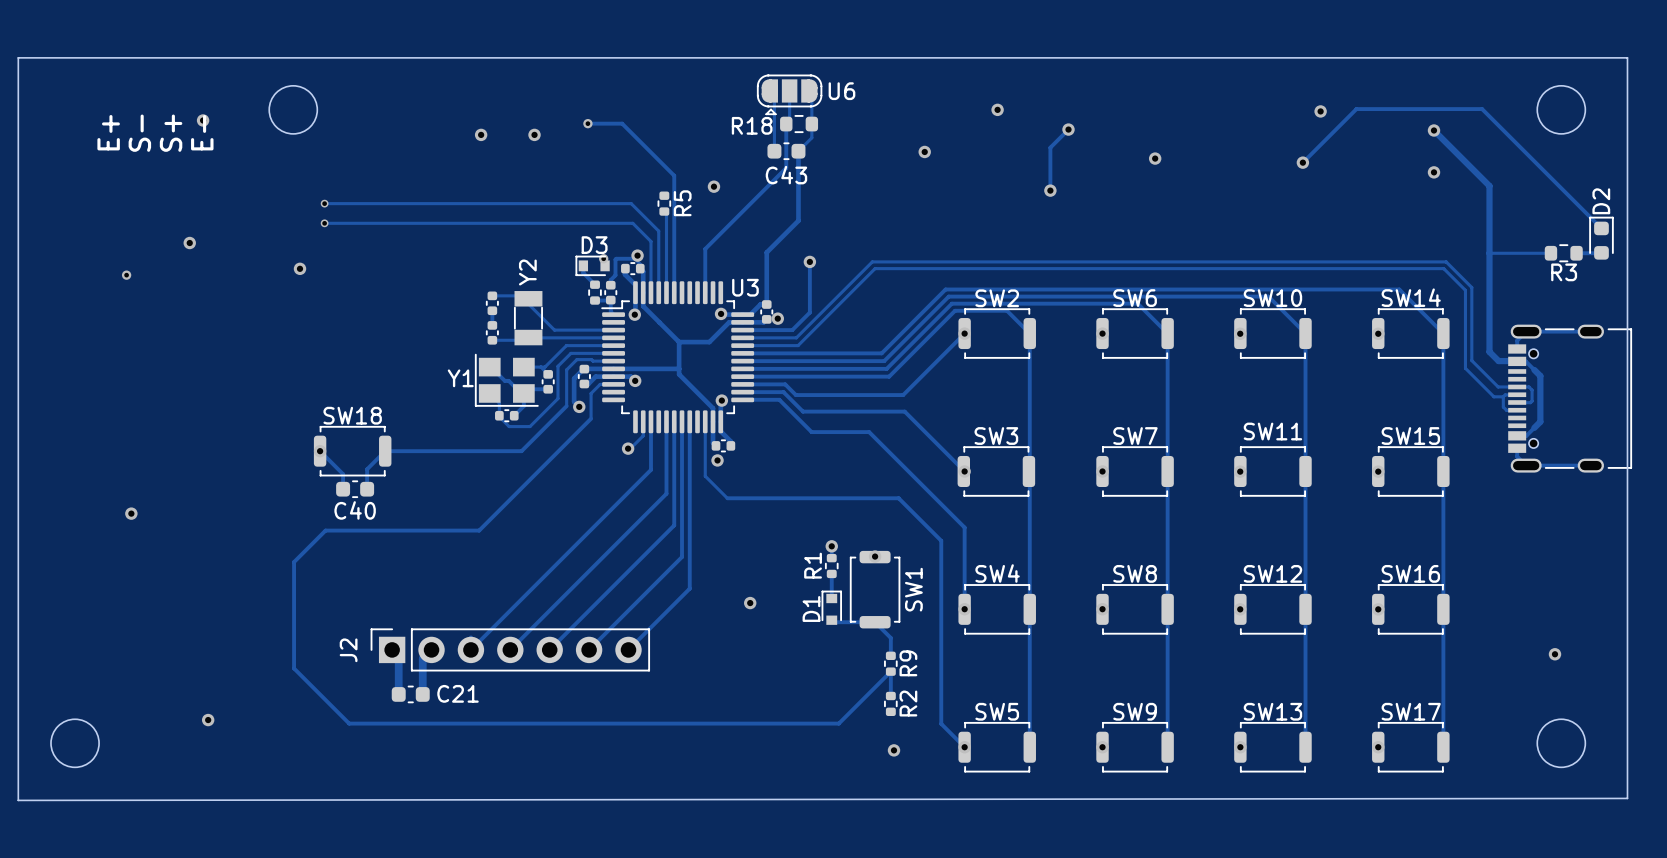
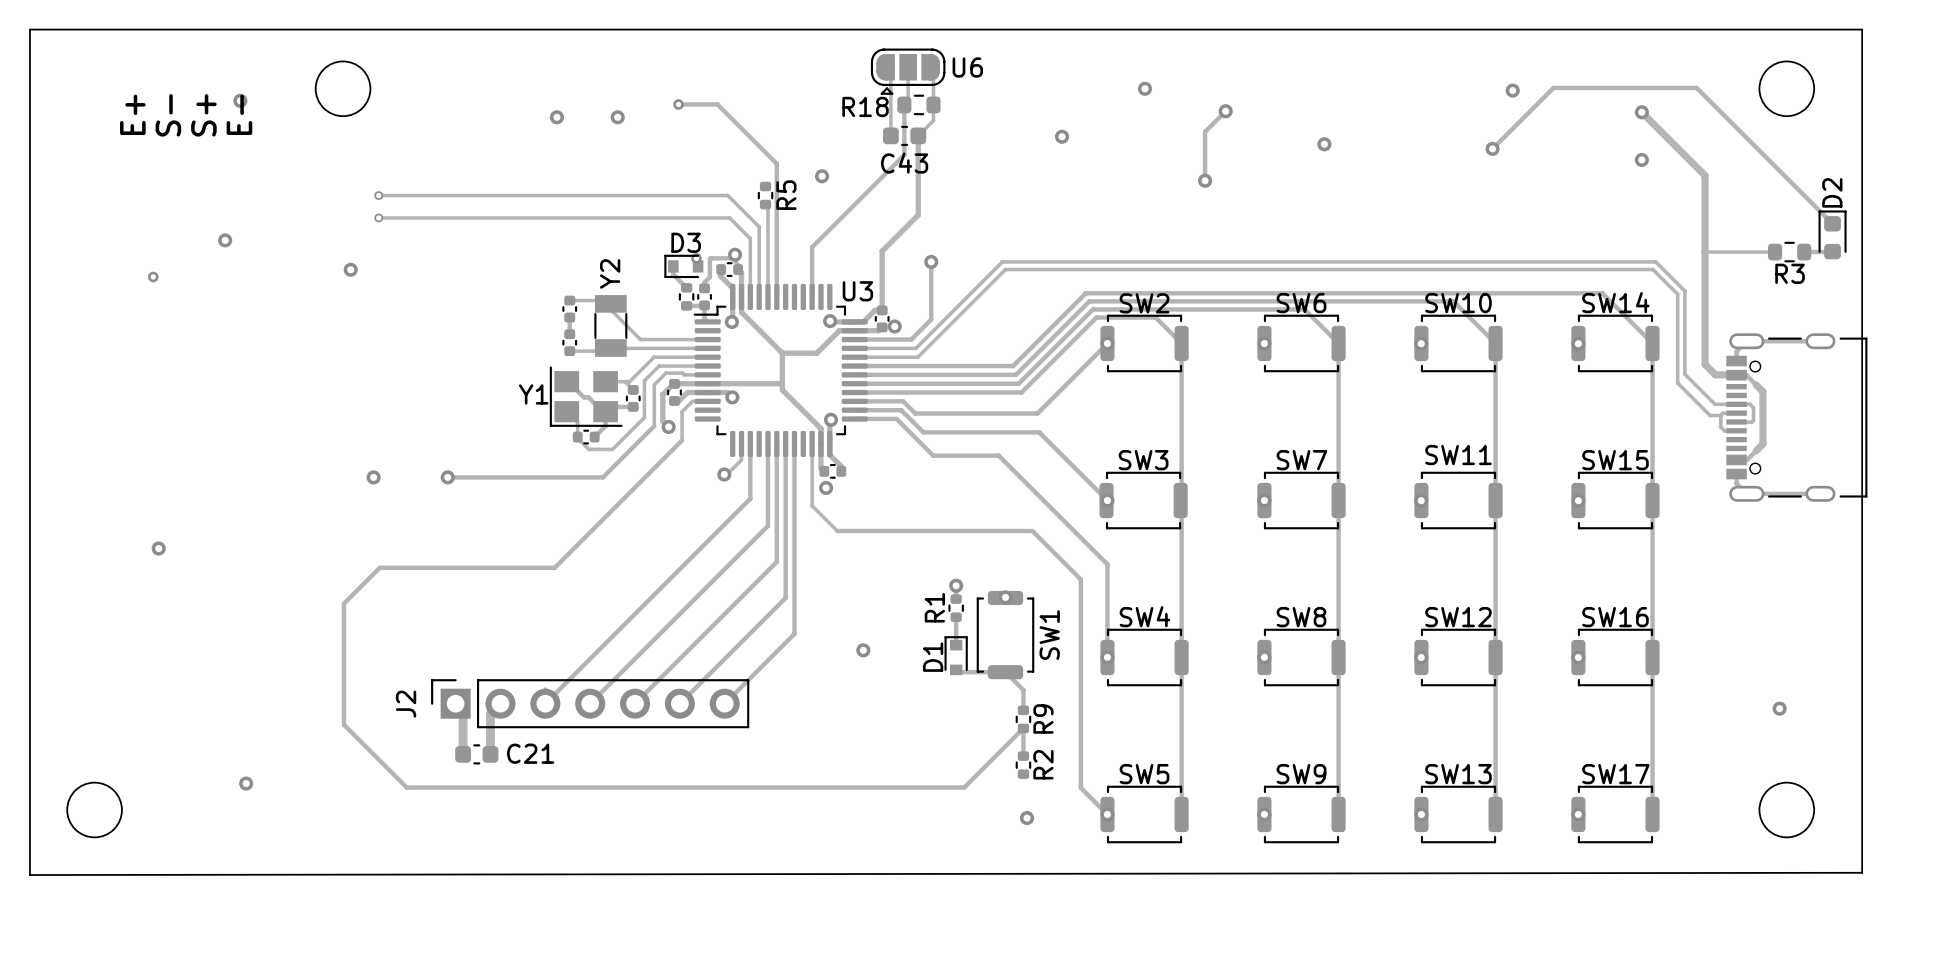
track: (320, 451) (343, 474) (343, 489) -> none
SW18: (352, 451) -> none
track: (385, 451) (367, 469) (367, 489) -> none
via: none -> (447, 477)
C40: (355, 489) -> none

